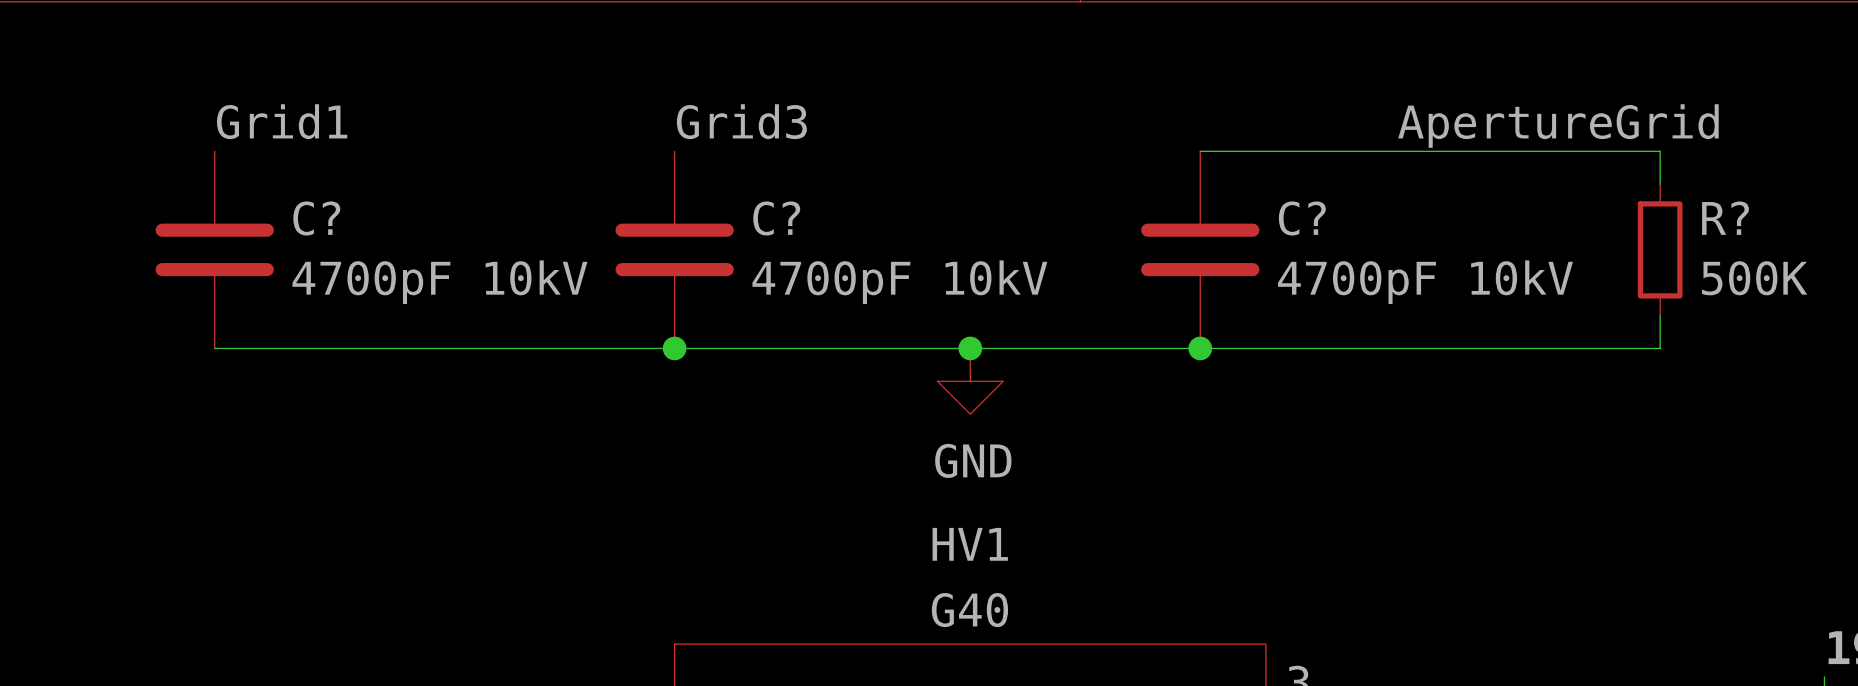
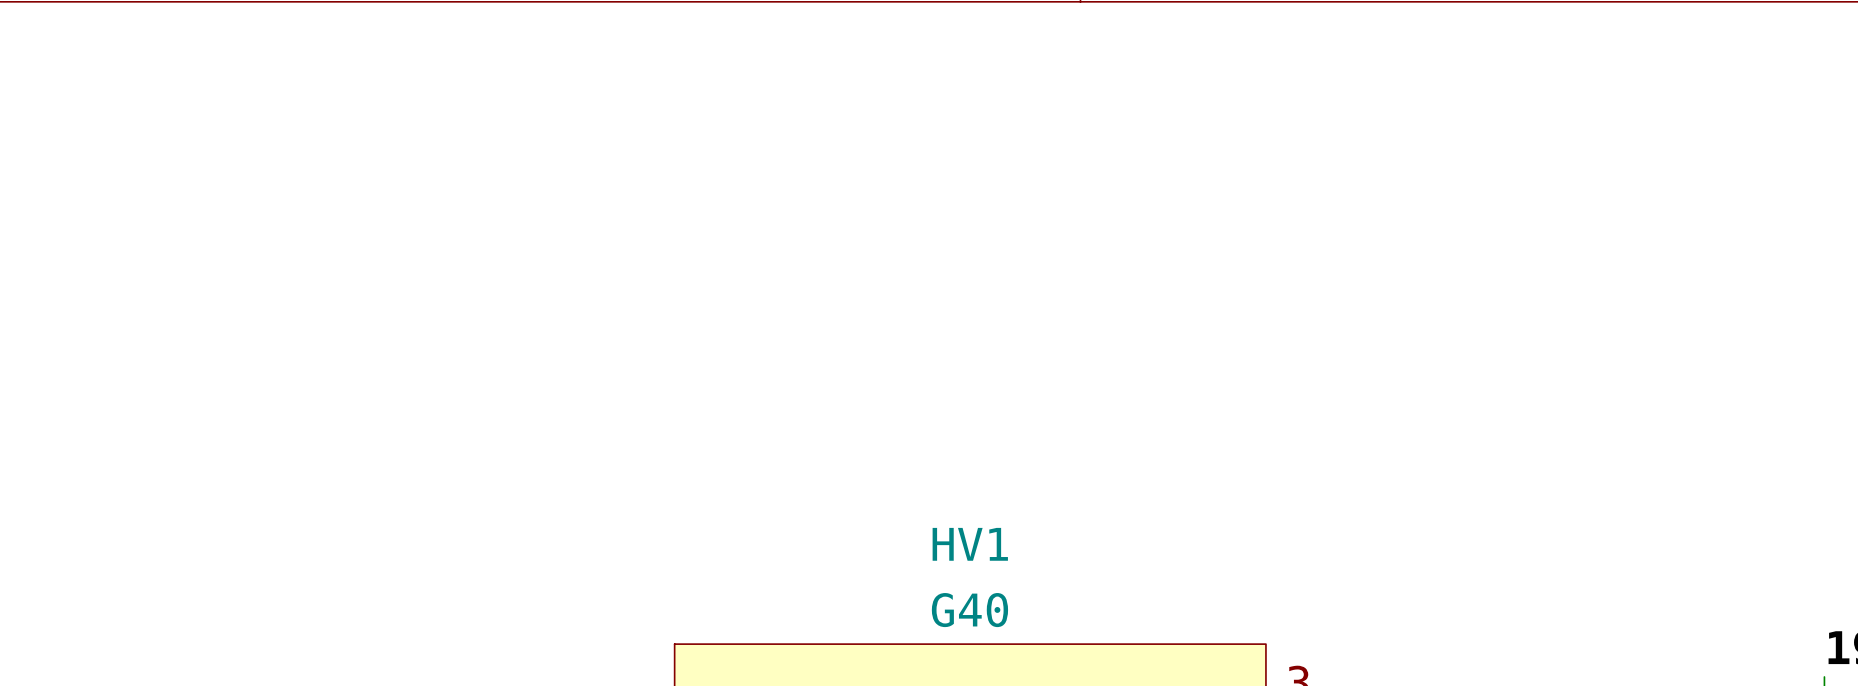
label: Grid1 (282, 121) -> none
label: Grid3 (741, 121) -> none
label: ApertureGrid (1558, 126) -> none
wire: (1200, 151) (1660, 151) (1660, 184) -> none
C?: 4700pF 10kV (214, 249) -> none
C?: 4700pF 10kV (674, 249) -> none
C?: 4700pF 10kV (1200, 249) -> none
R?: 500K (1660, 249) -> none
wire: (1660, 315) (1660, 348) (214, 348) -> none
junction: (674, 348) -> none
junction: (970, 348) -> none
junction: (1200, 348) -> none
power symbol: GND (970, 381) -> none

